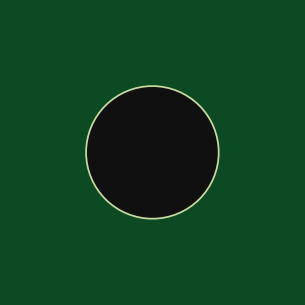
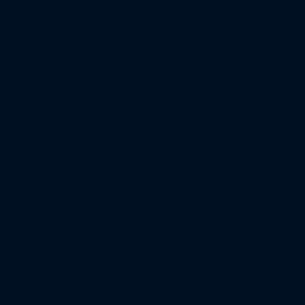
part: (152, 152) -> none

